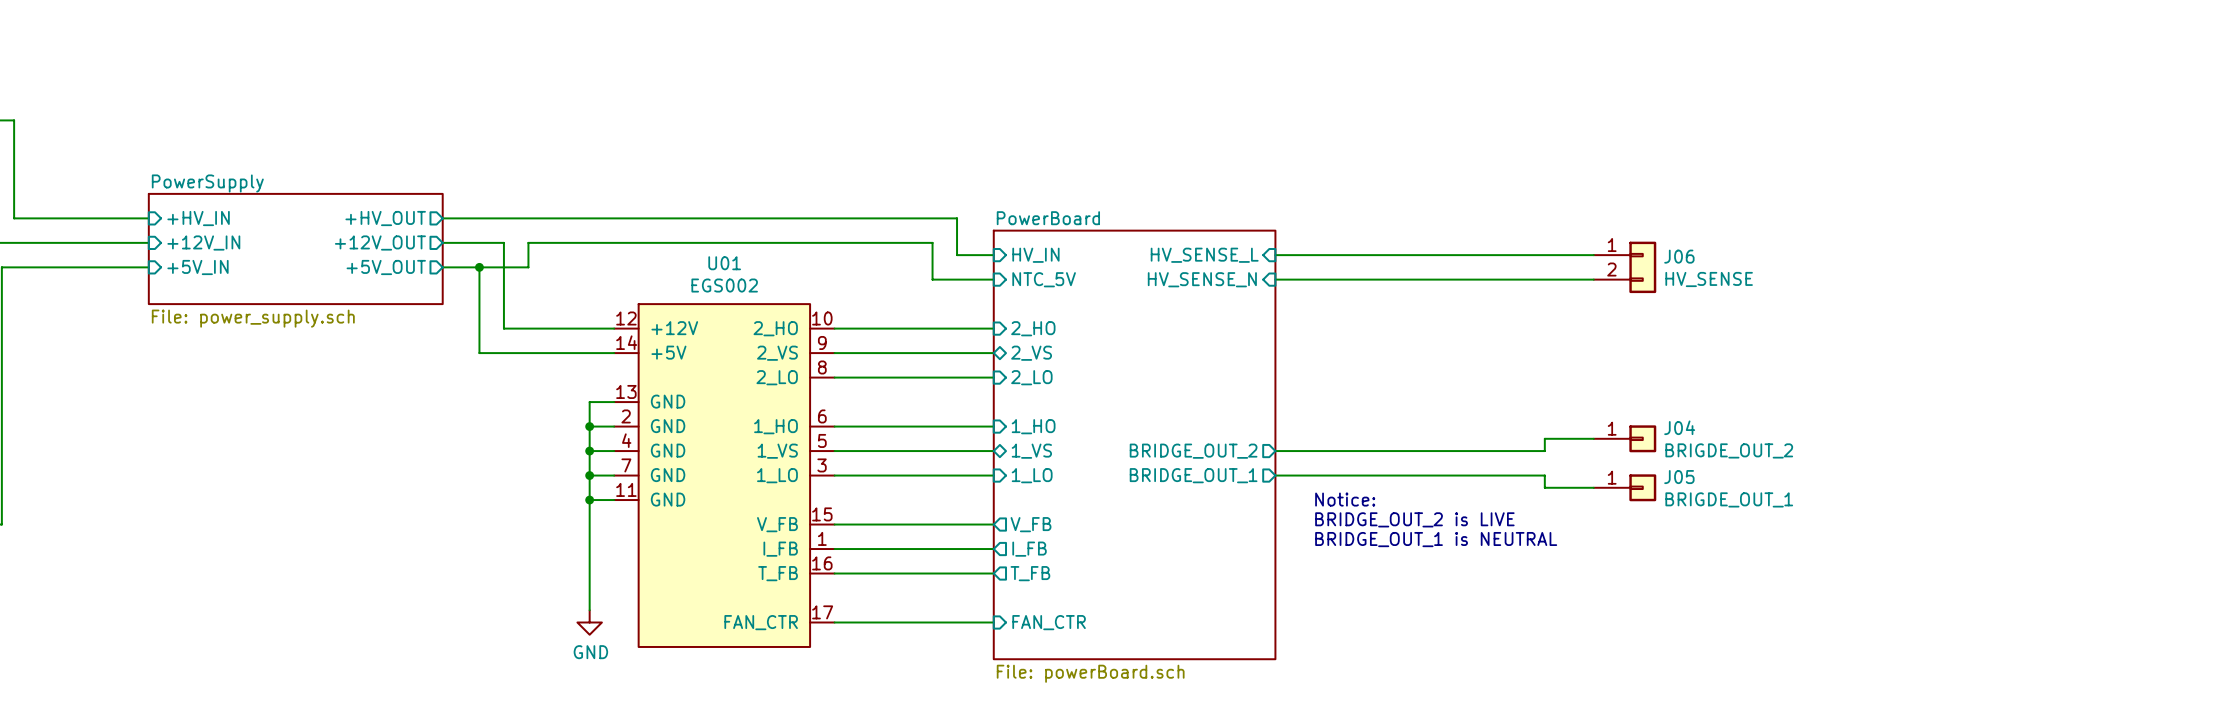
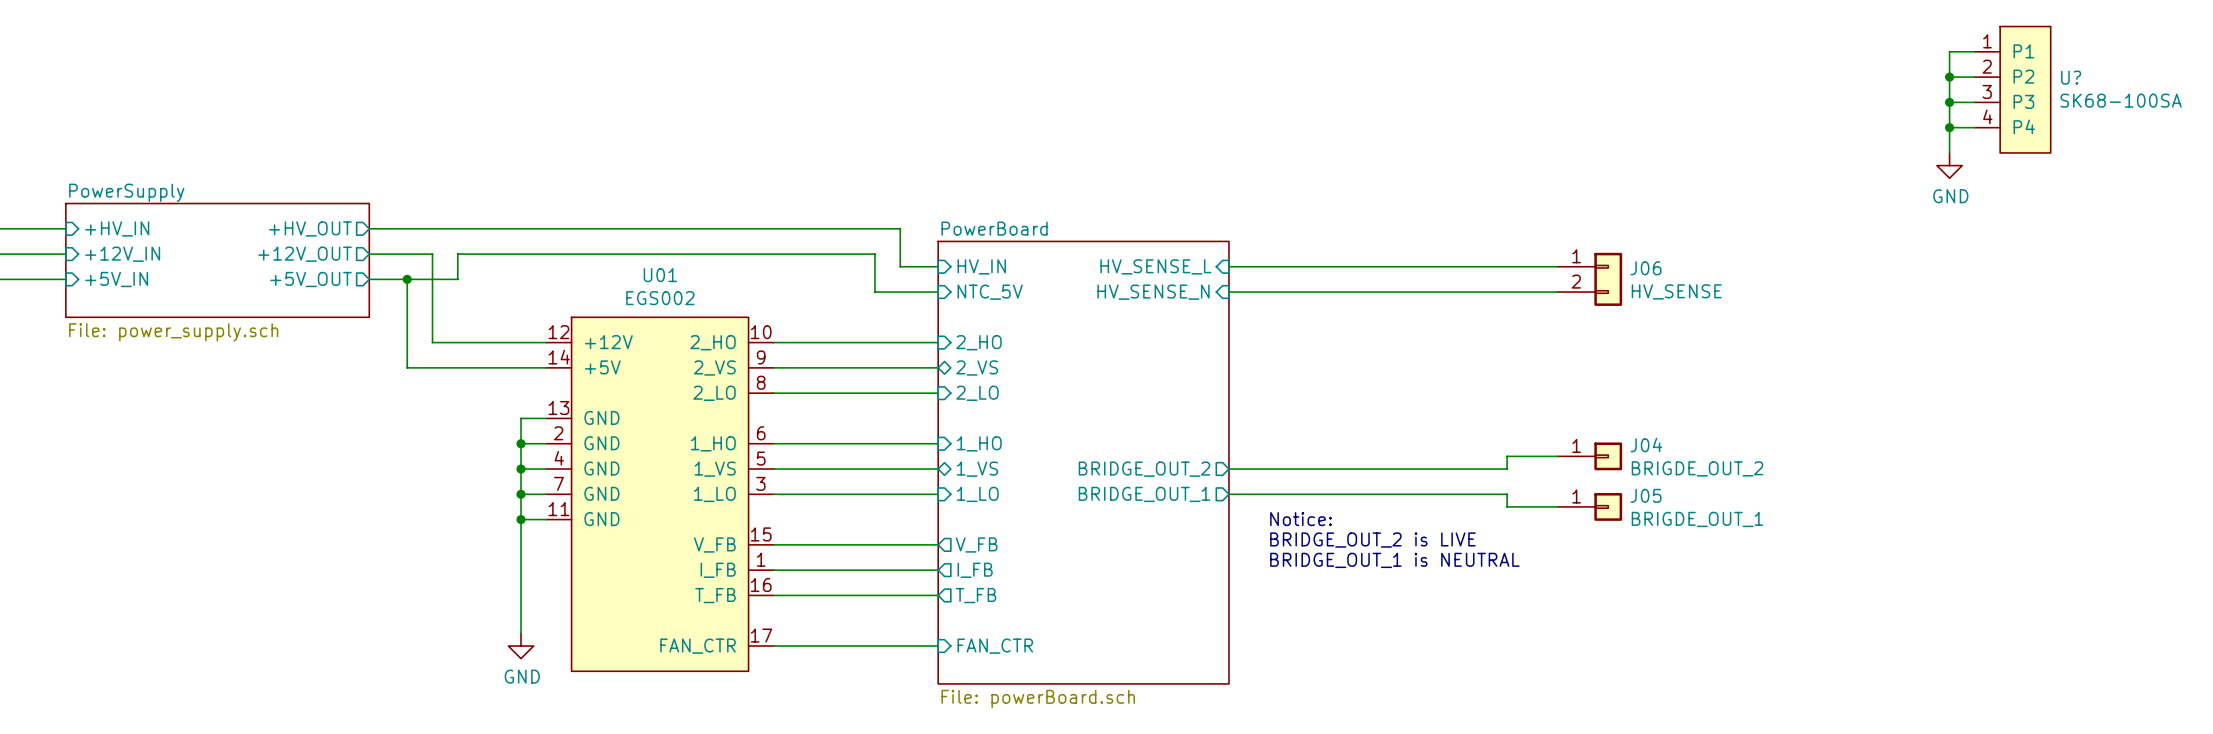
wire: none -> (1974, 51) (1949, 51) (1949, 152)
wire: none -> (1949, 77) (1974, 77)
junction: none -> (1949, 77)
U?: none -> SK68-100SA (2012, 89)
wire: none -> (1949, 102) (1974, 102)
junction: none -> (1949, 102)
wire: none -> (1949, 127) (1974, 127)
junction: none -> (1949, 127)
power symbol: none -> GND (1949, 165)

